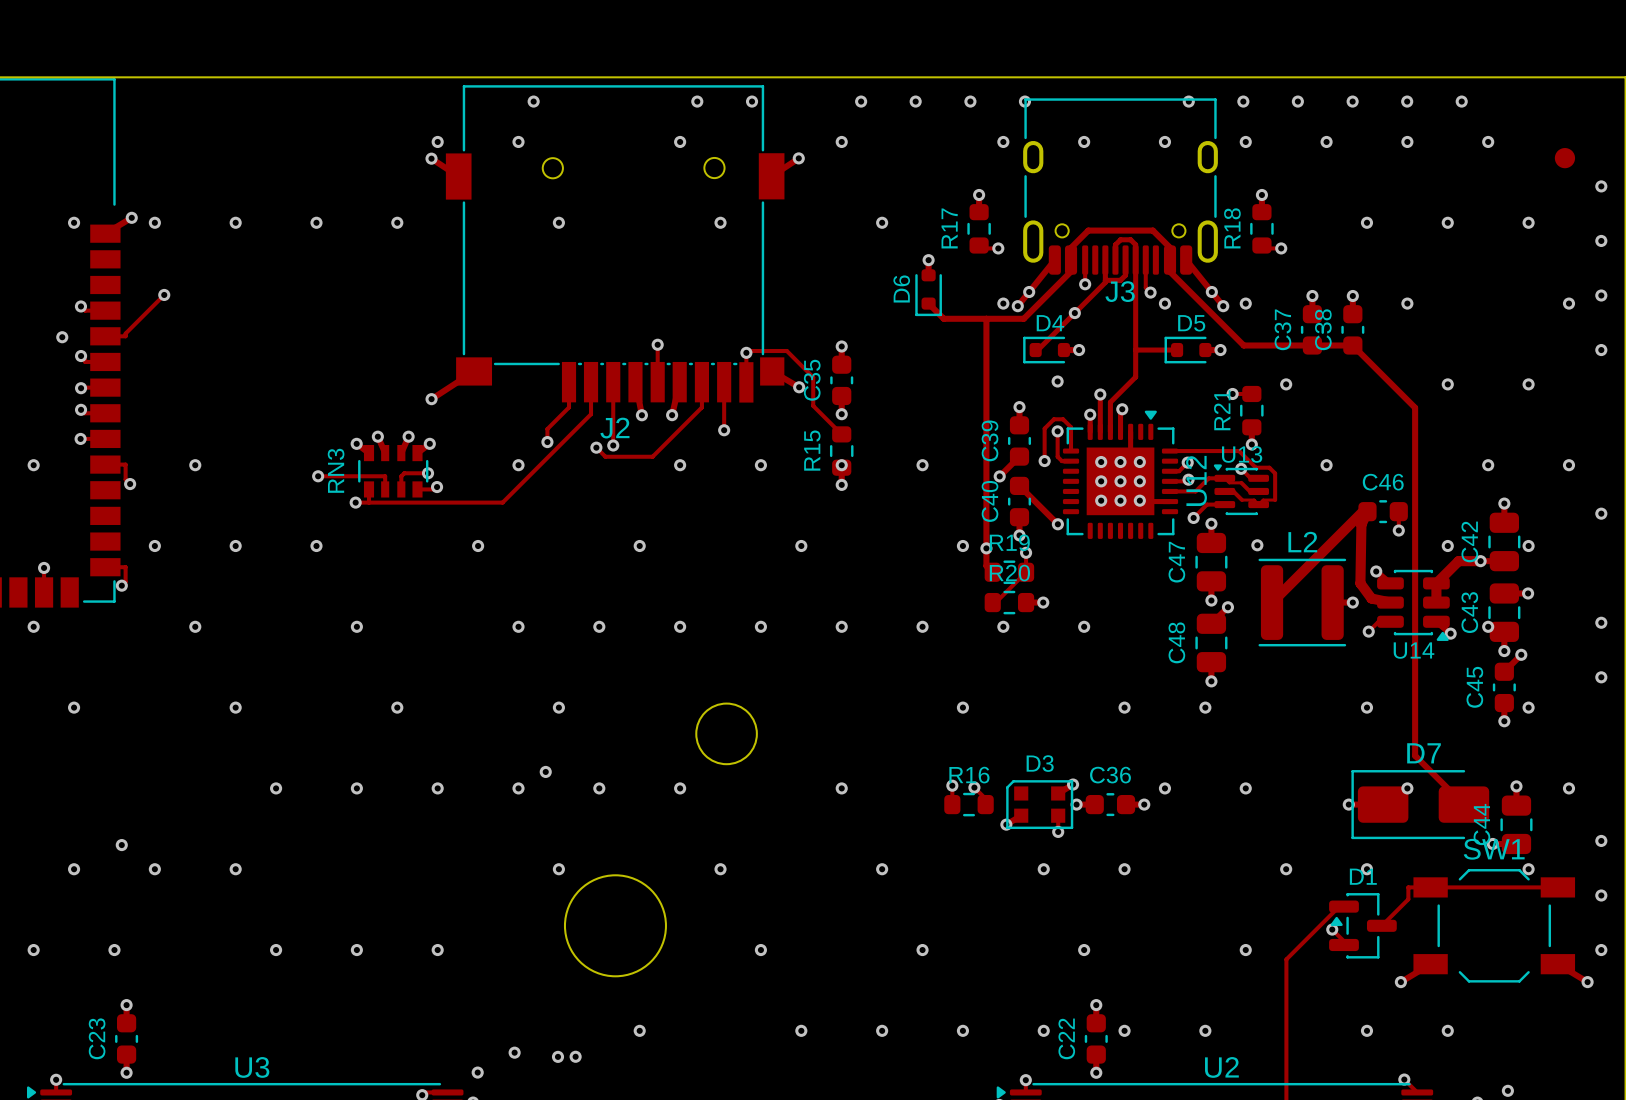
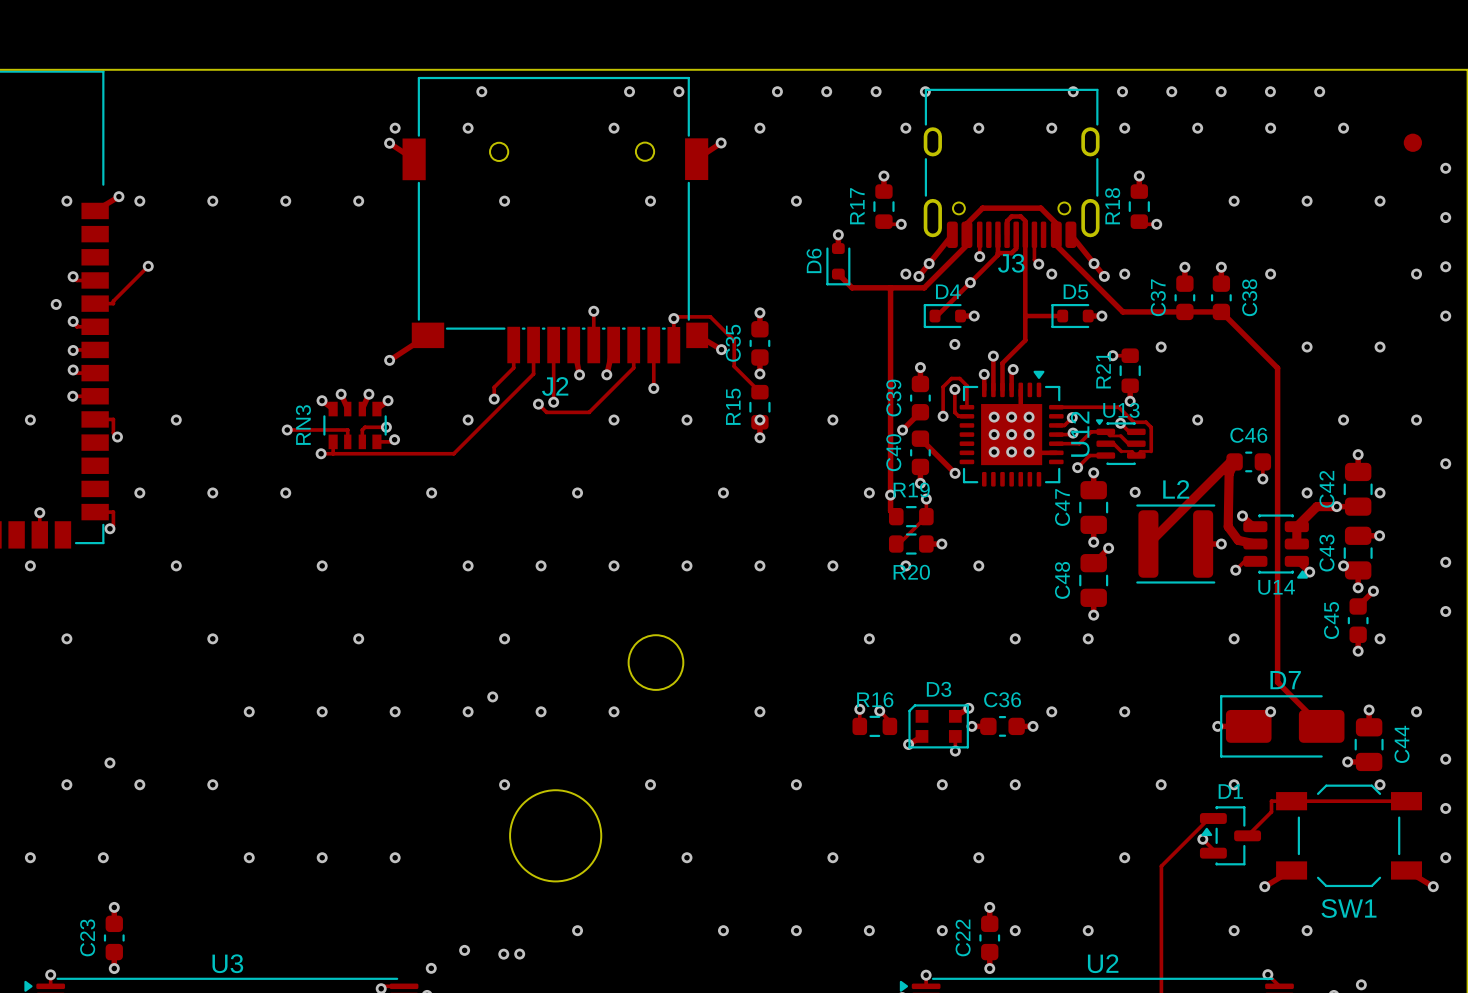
C38 name position: C38 (1323, 329) -> C38 (1249, 297)
R20 name position: R20 (1009, 573) -> R20 (911, 572)
C44 name position: C44 (1481, 824) -> C44 (1402, 744)
SW1 name position: SW1 (1494, 849) -> SW1 (1349, 908)

